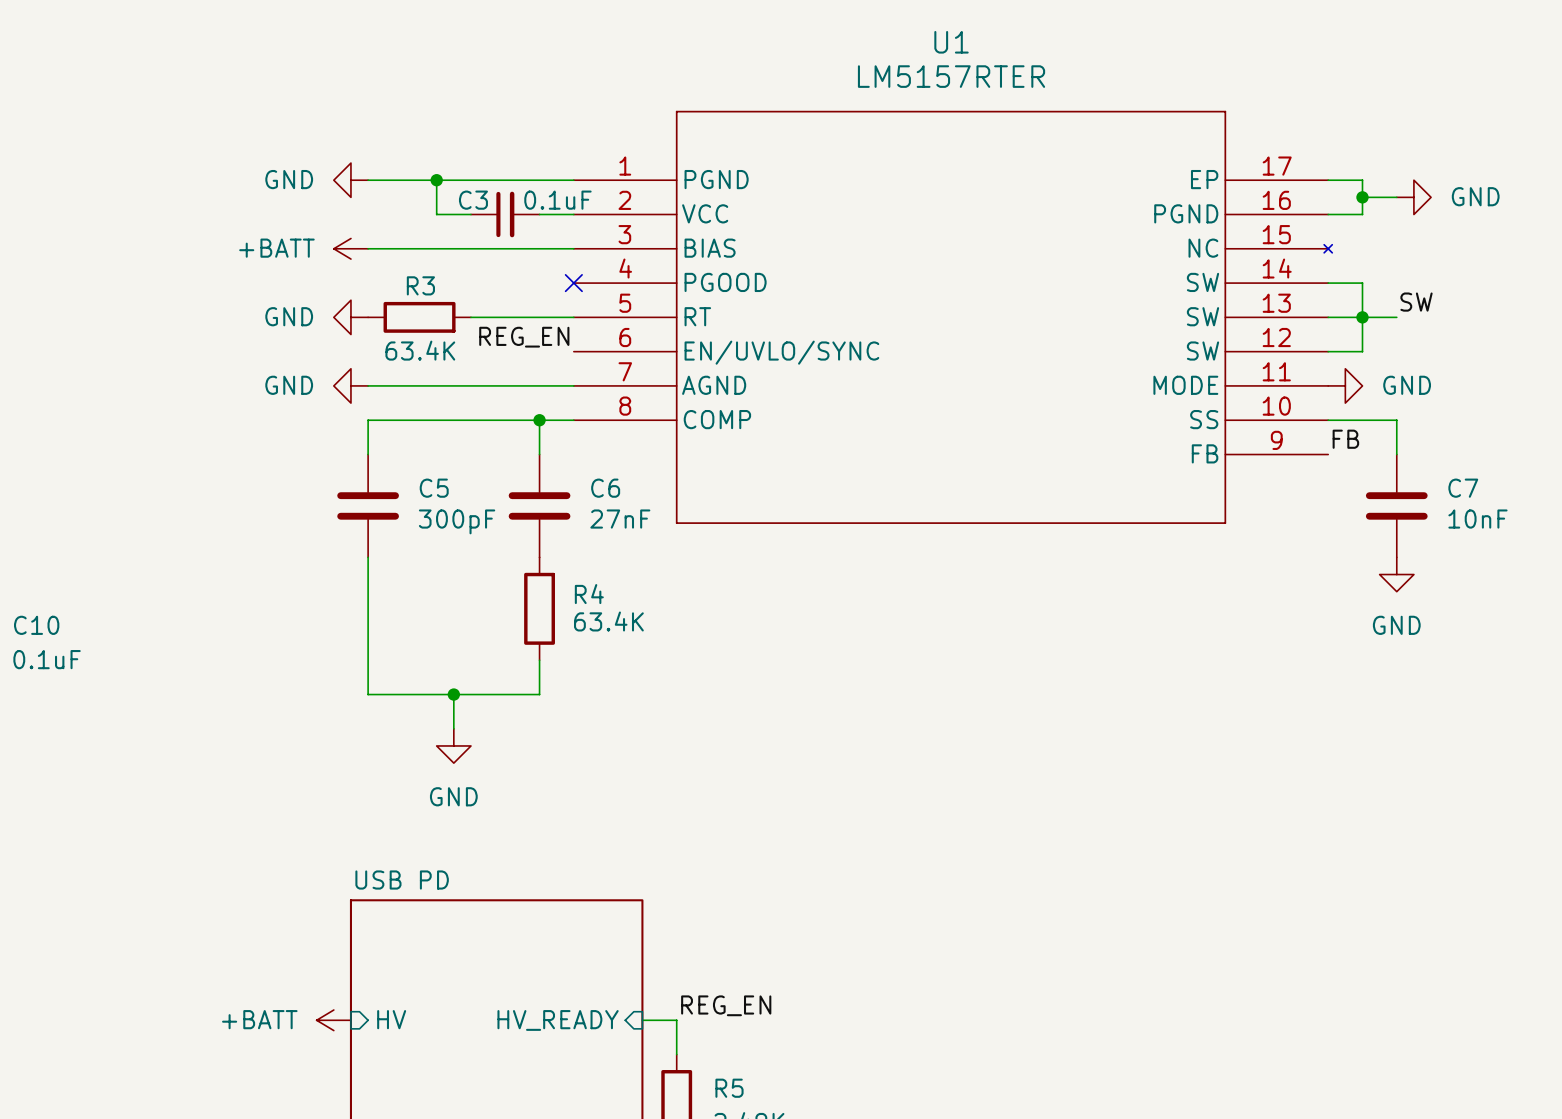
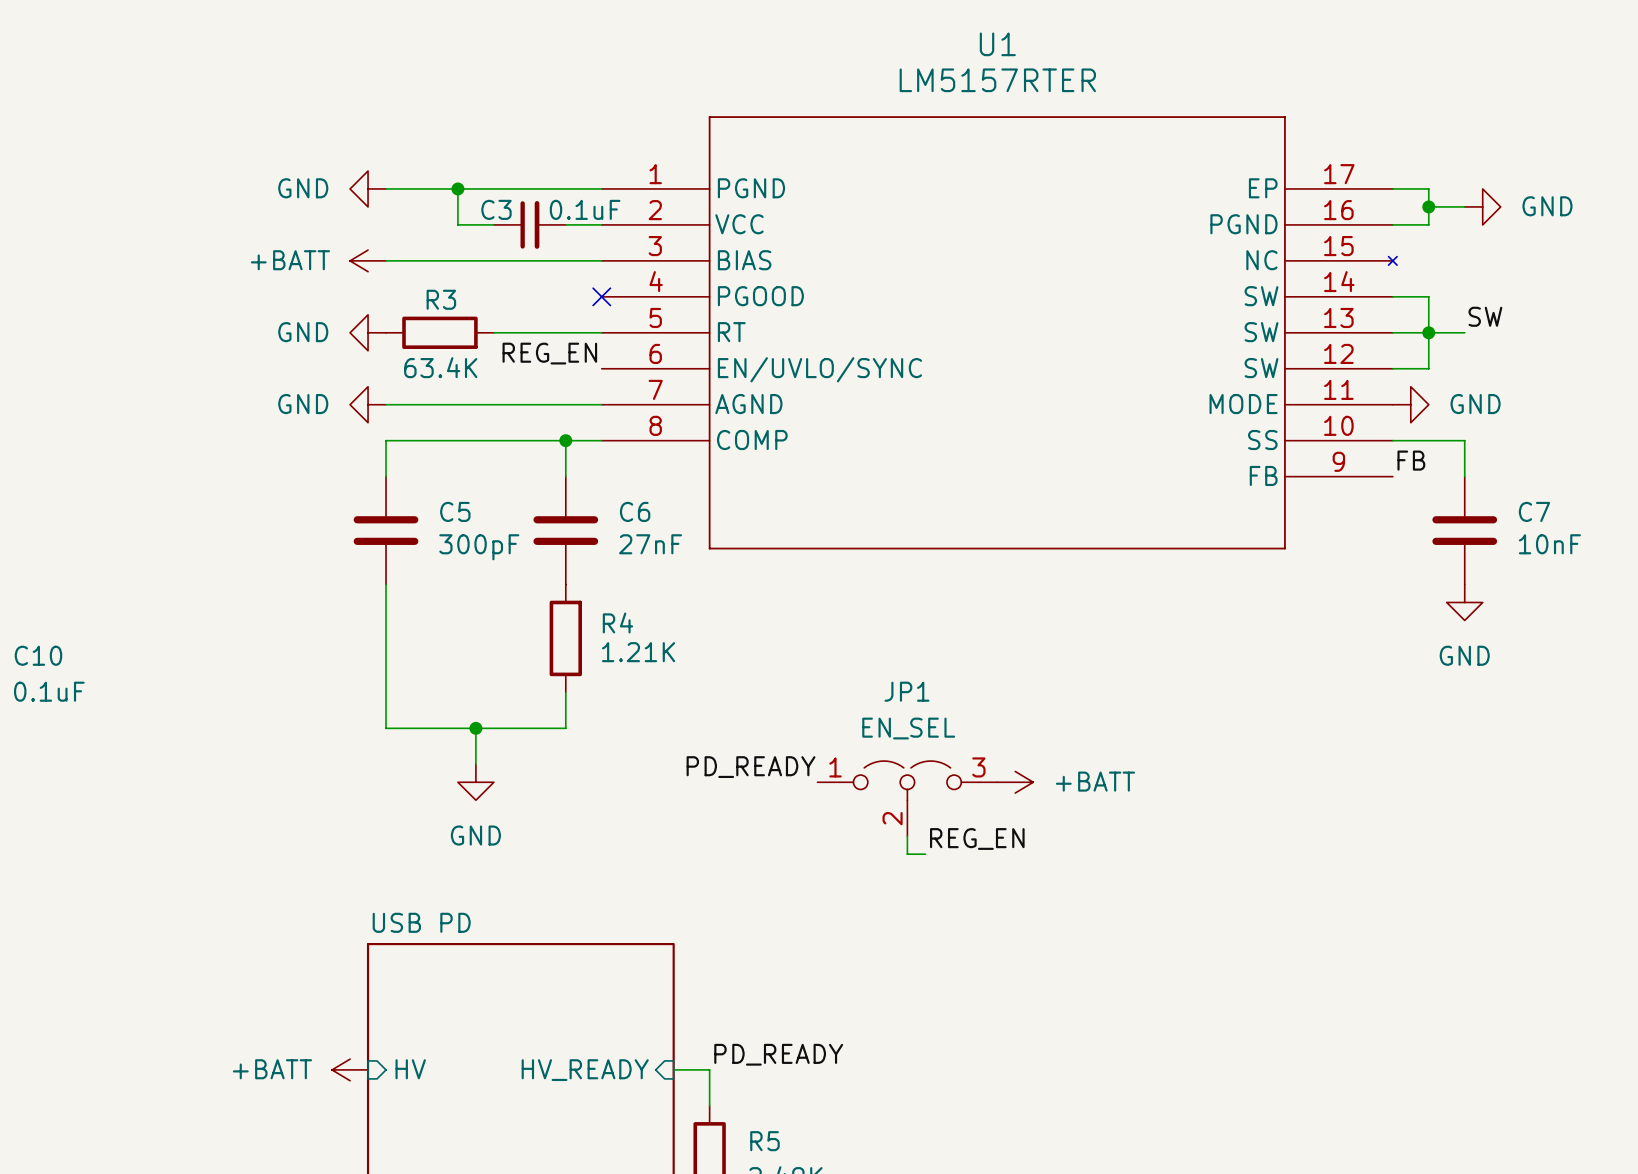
R4 value: 63.4K (608, 621) -> 1.21K (638, 652)
label: none -> PD_READY (751, 767)
power symbol: none -> +BATT (1015, 782)
JP1: none -> EN_SEL (907, 798)
wire: none -> (907, 836) (907, 854) (925, 854)
label: none -> REG_EN (977, 838)
label: REG_EN (726, 1005) -> PD_READY (778, 1054)

